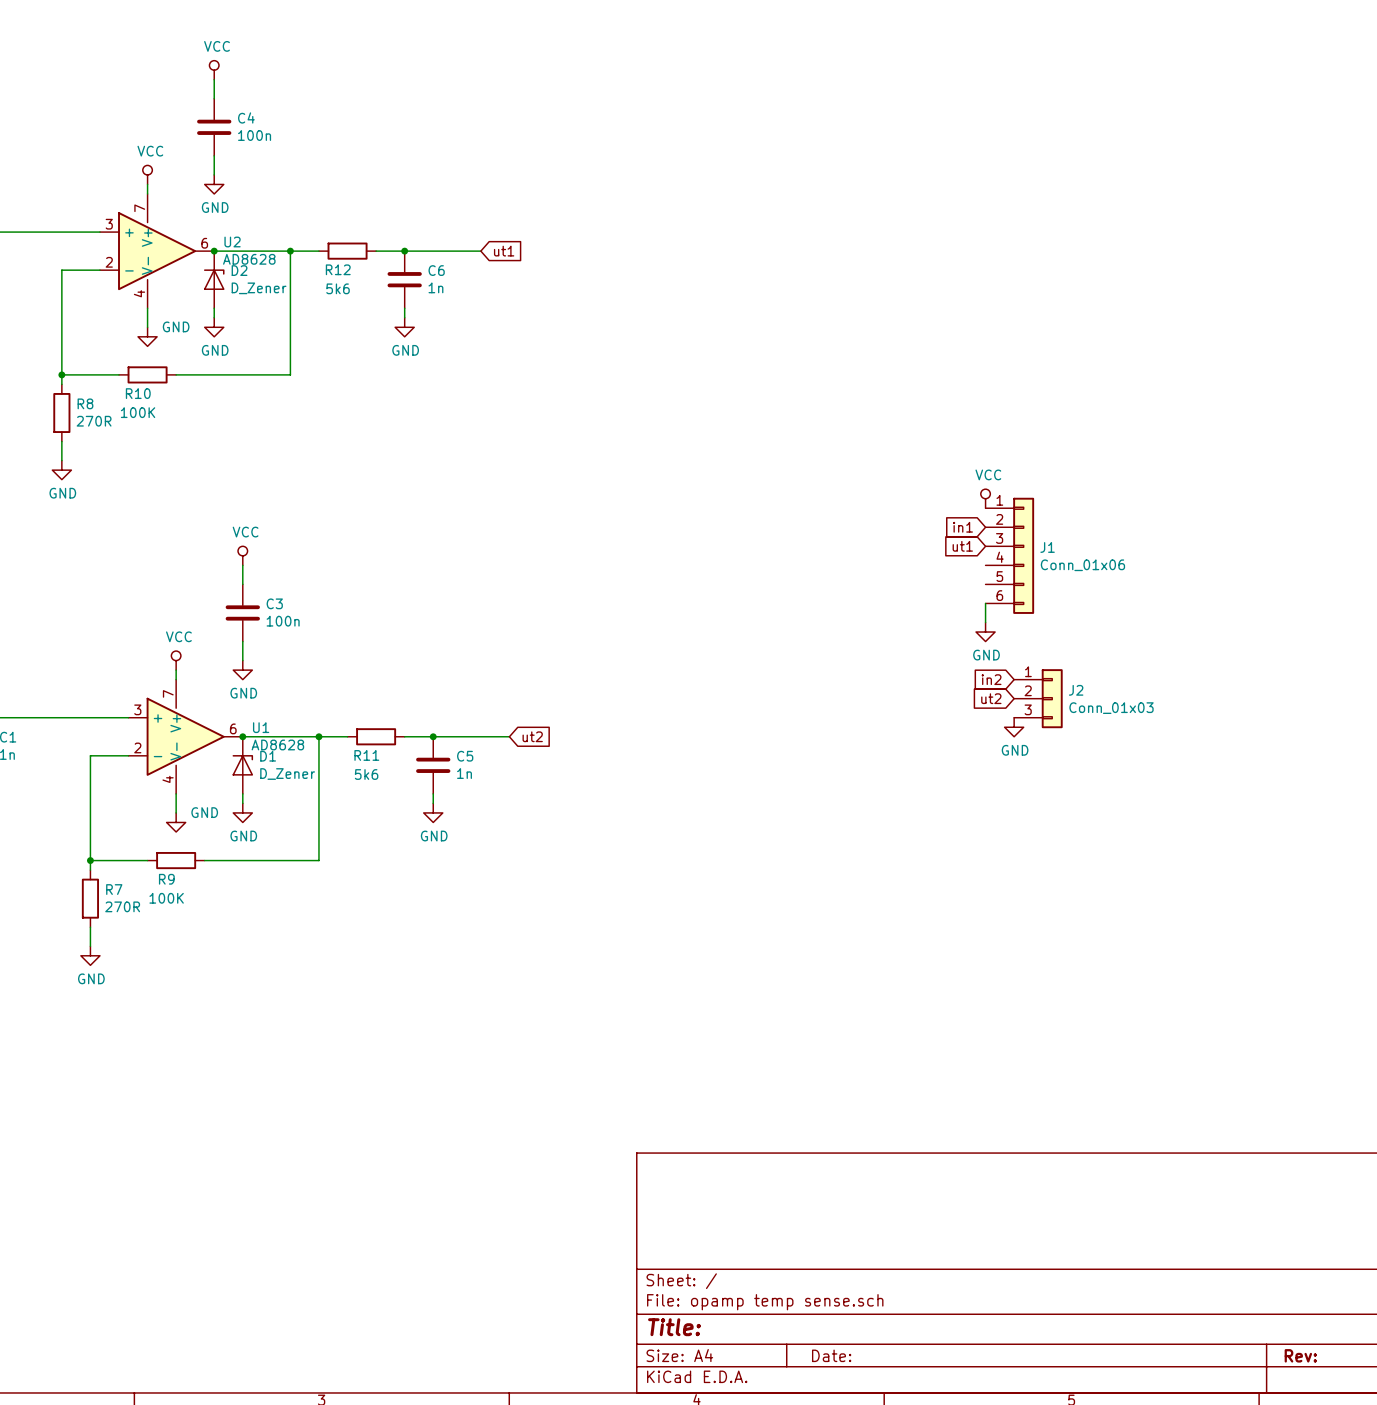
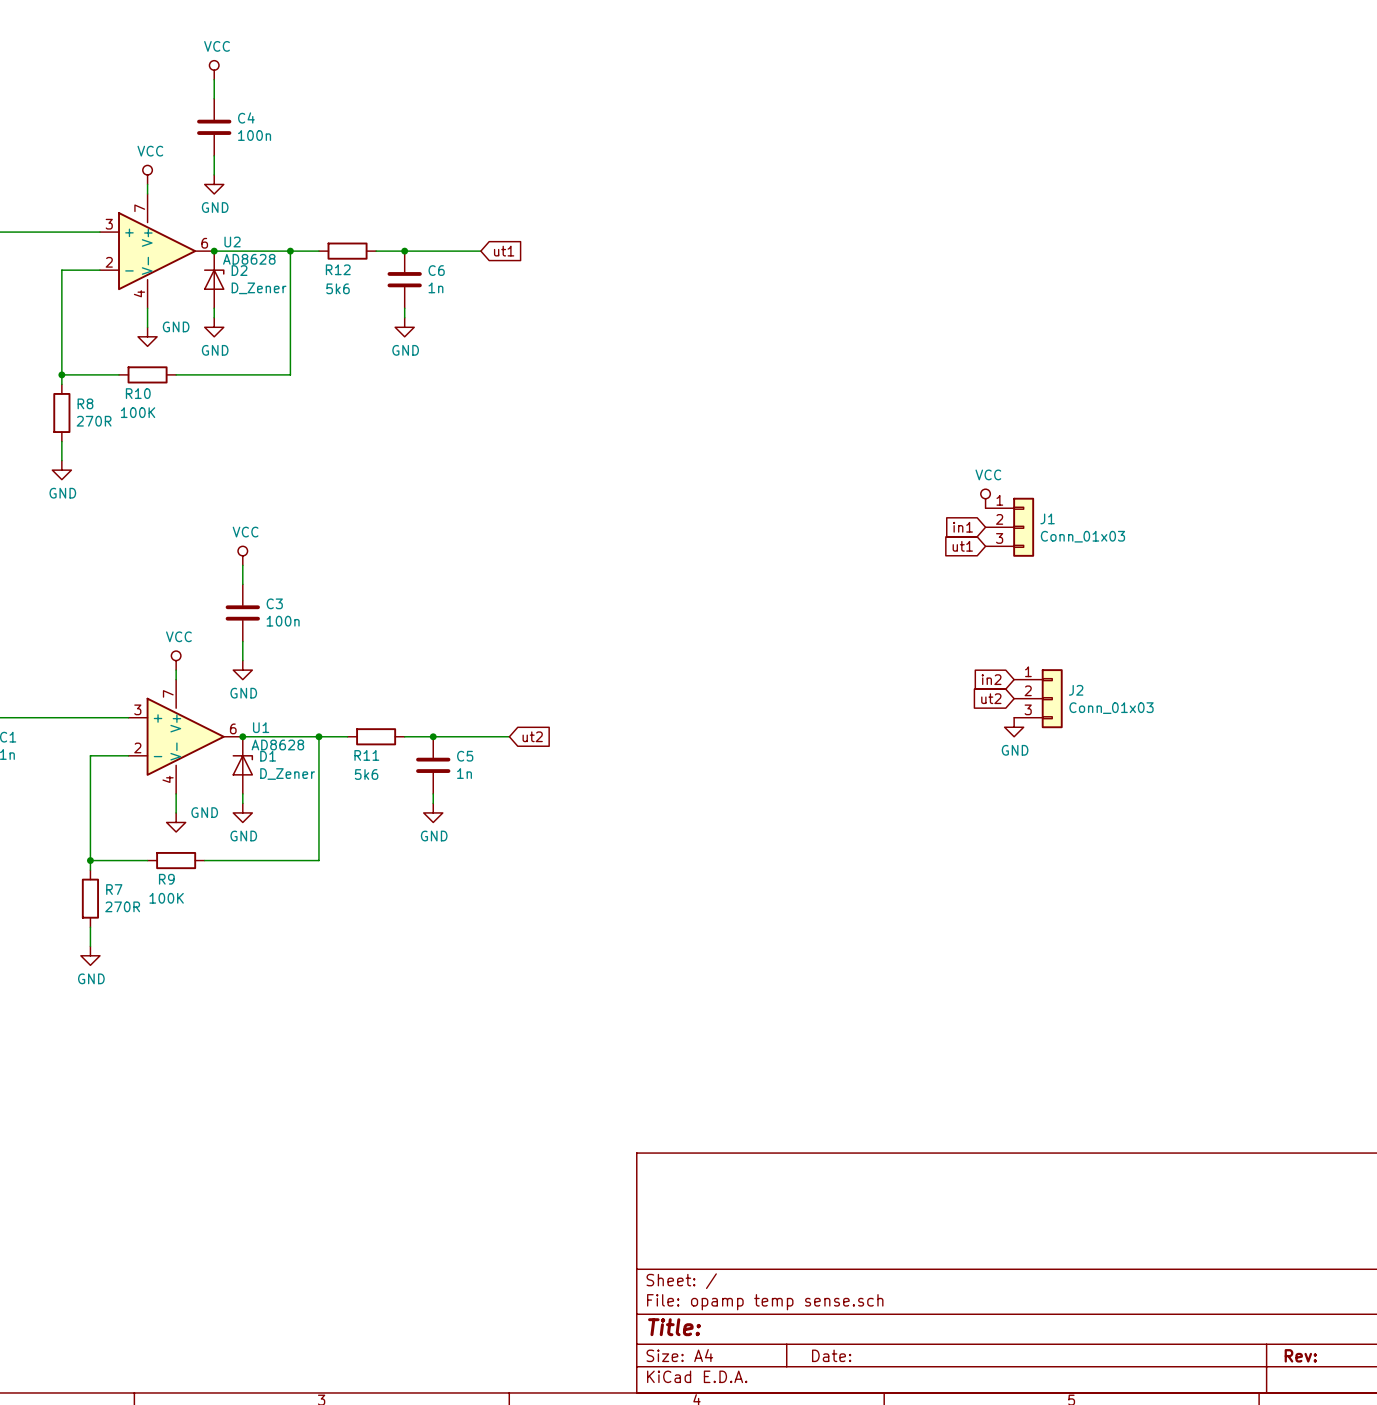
J1 symbol: [985, 497, 1035, 614] -> [985, 497, 1035, 557]
J1 value: Conn_01x06 (1082, 565) -> Conn_01x03 (1082, 536)
wire: (985, 603) (985, 622) -> none
power symbol: GND (985, 632) -> none

